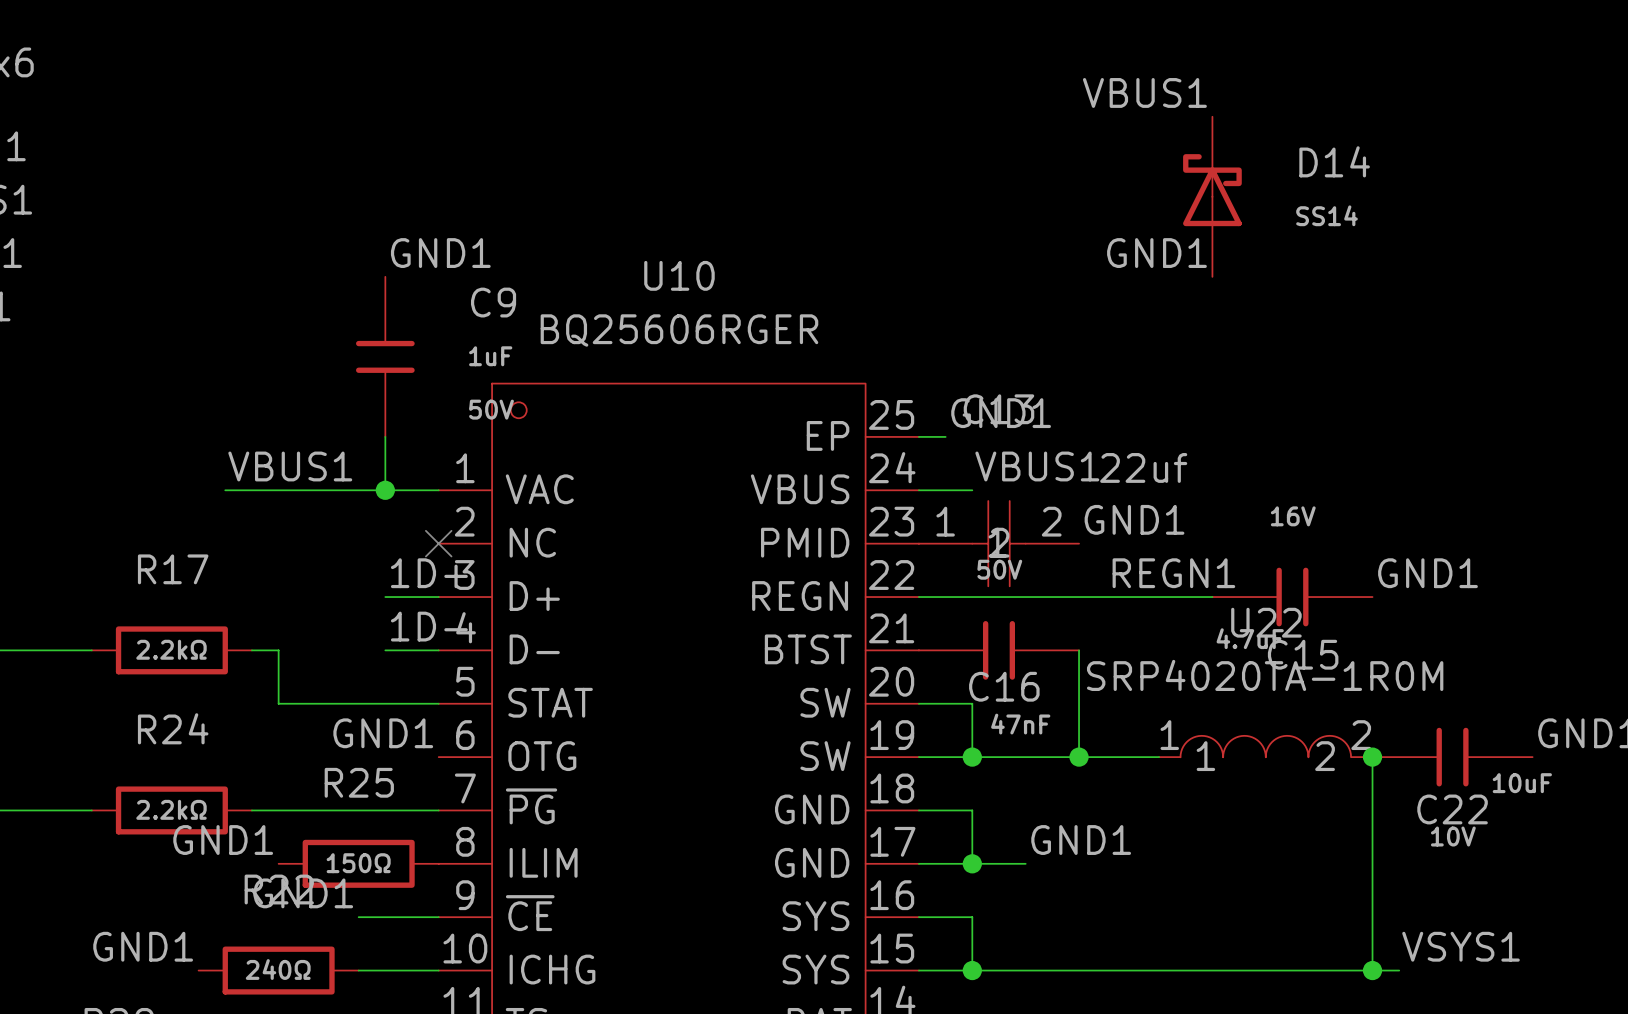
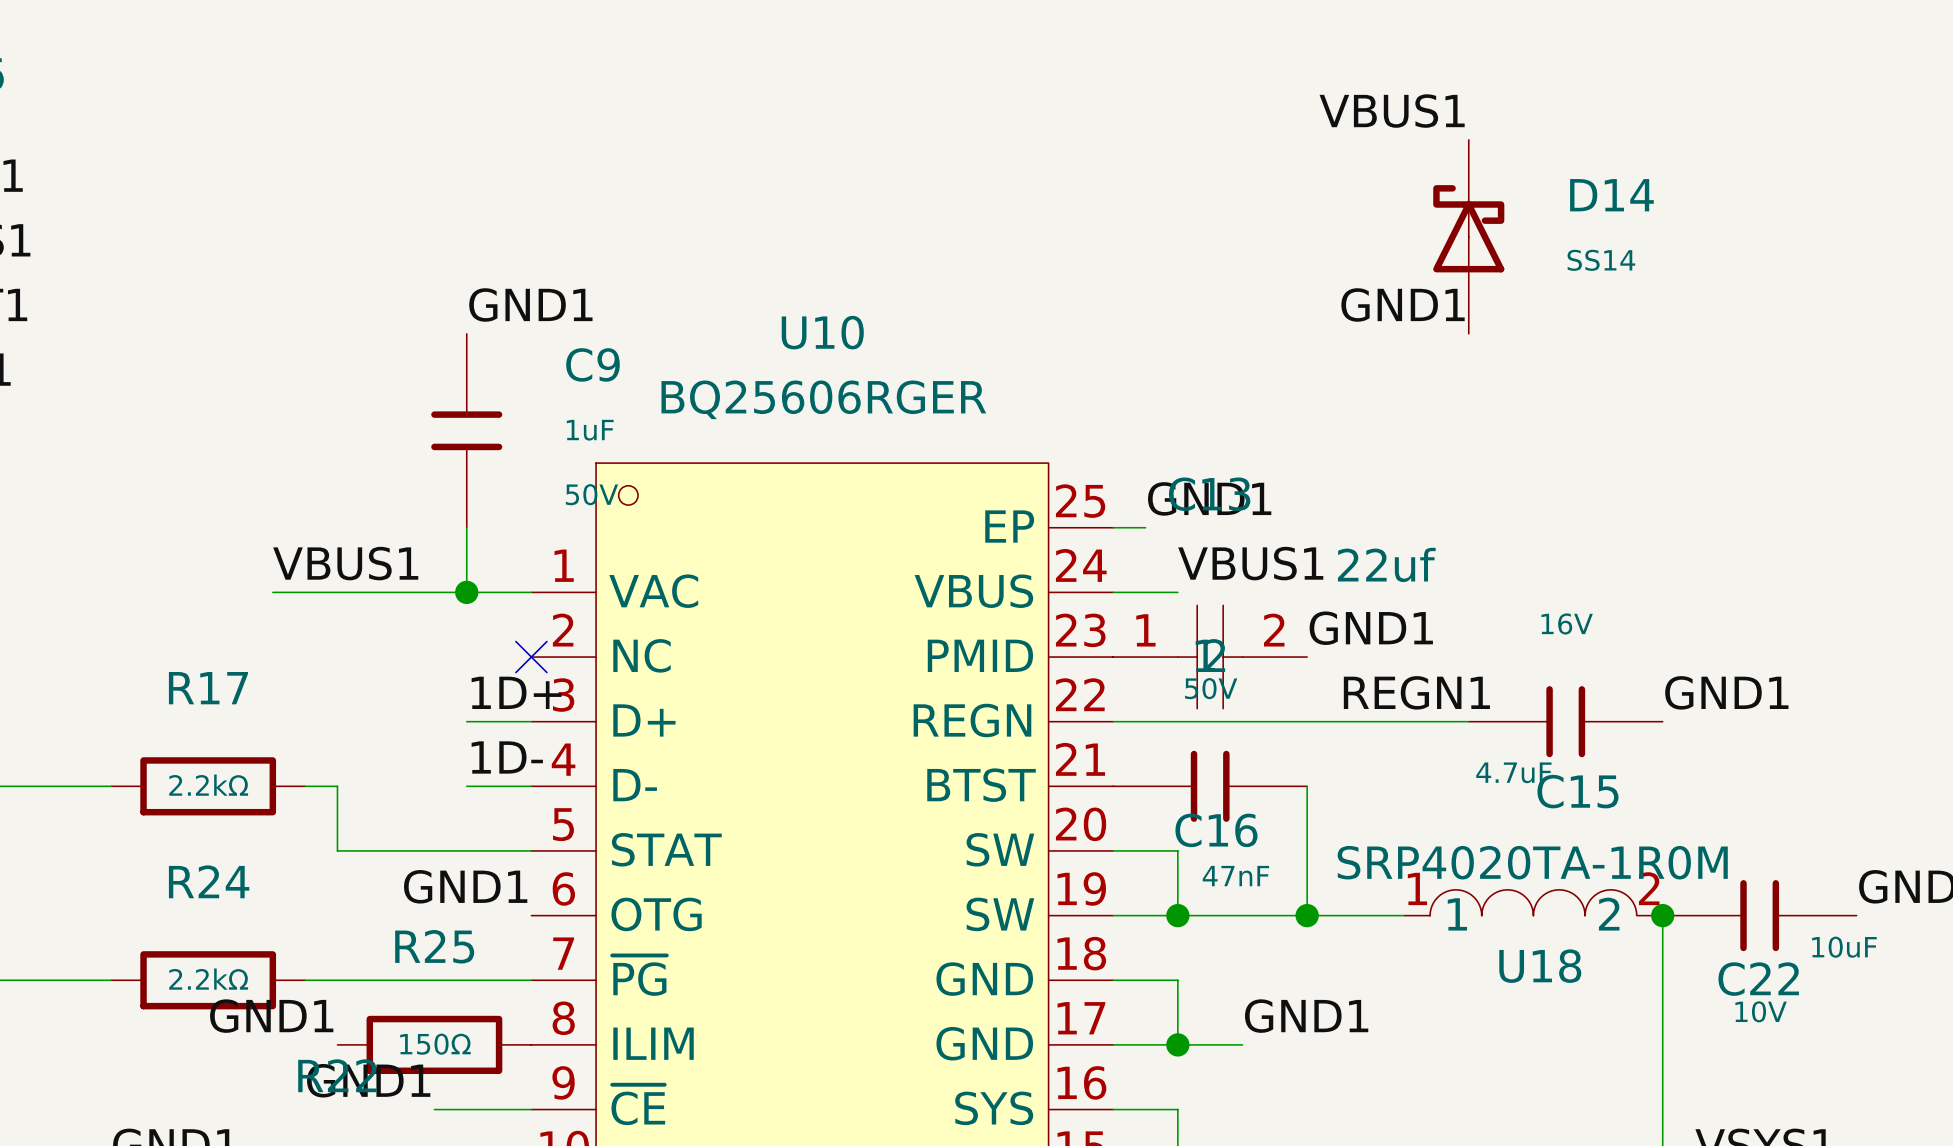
U22 name: U22 (1266, 622) -> U18 (1540, 966)
U22 value position: SRP4020TA-1R0M (1265, 675) -> SRP4020TA-1R0M (1532, 862)

